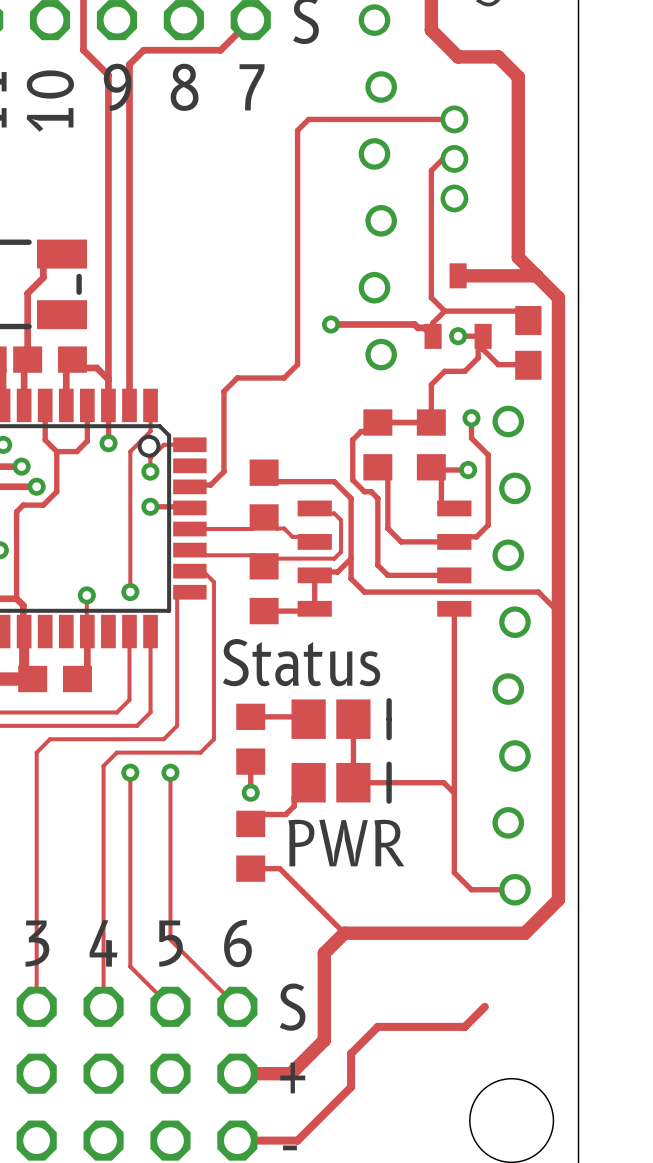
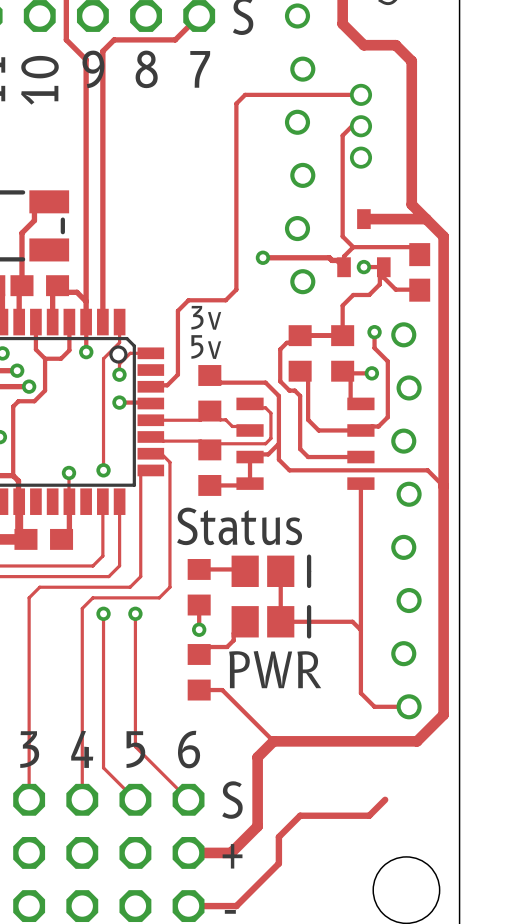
text: none -> 3v (206, 317)
text: none -> 5v (206, 347)

